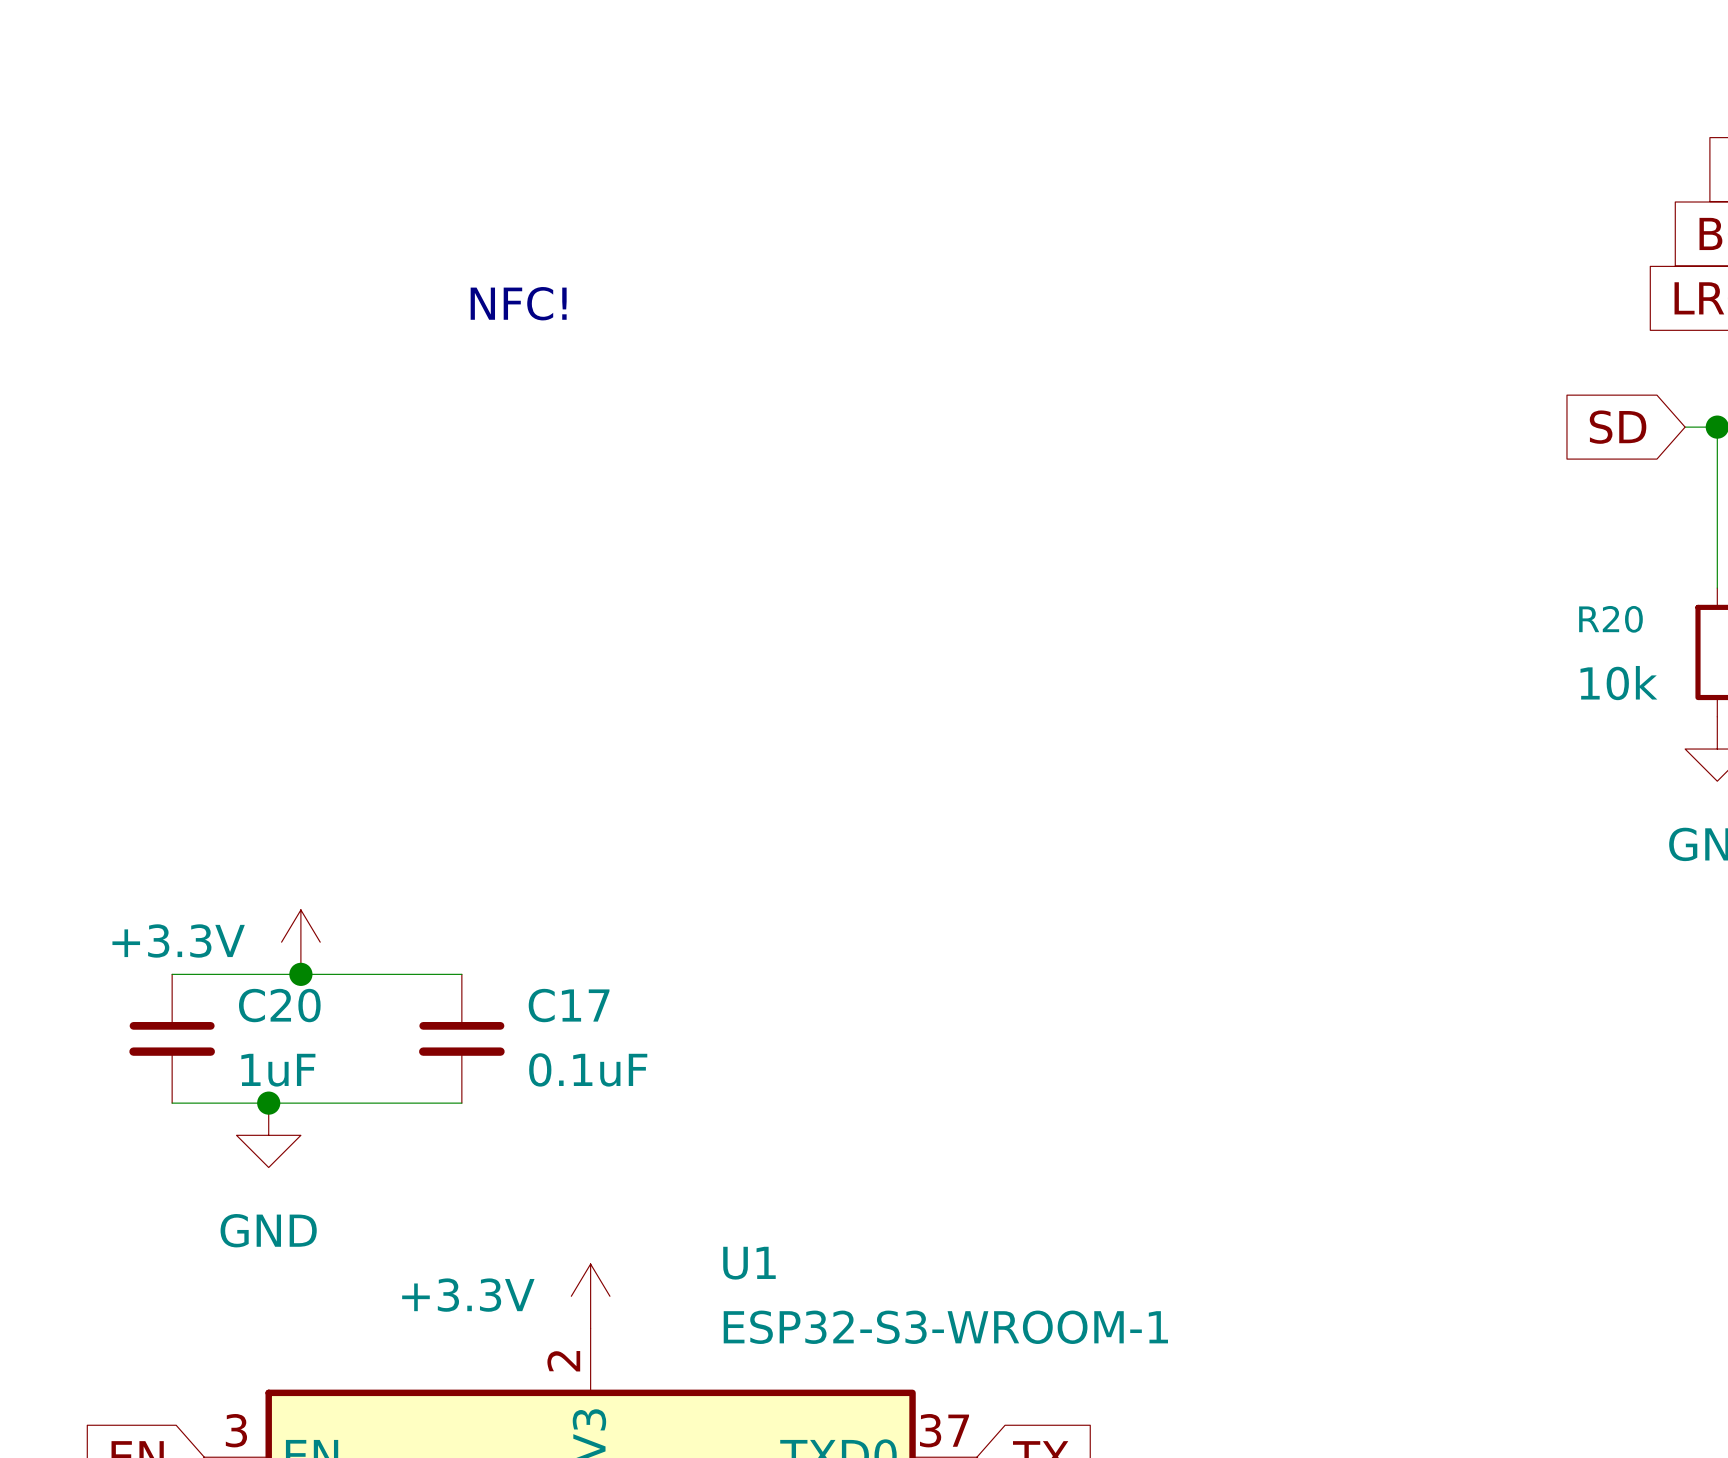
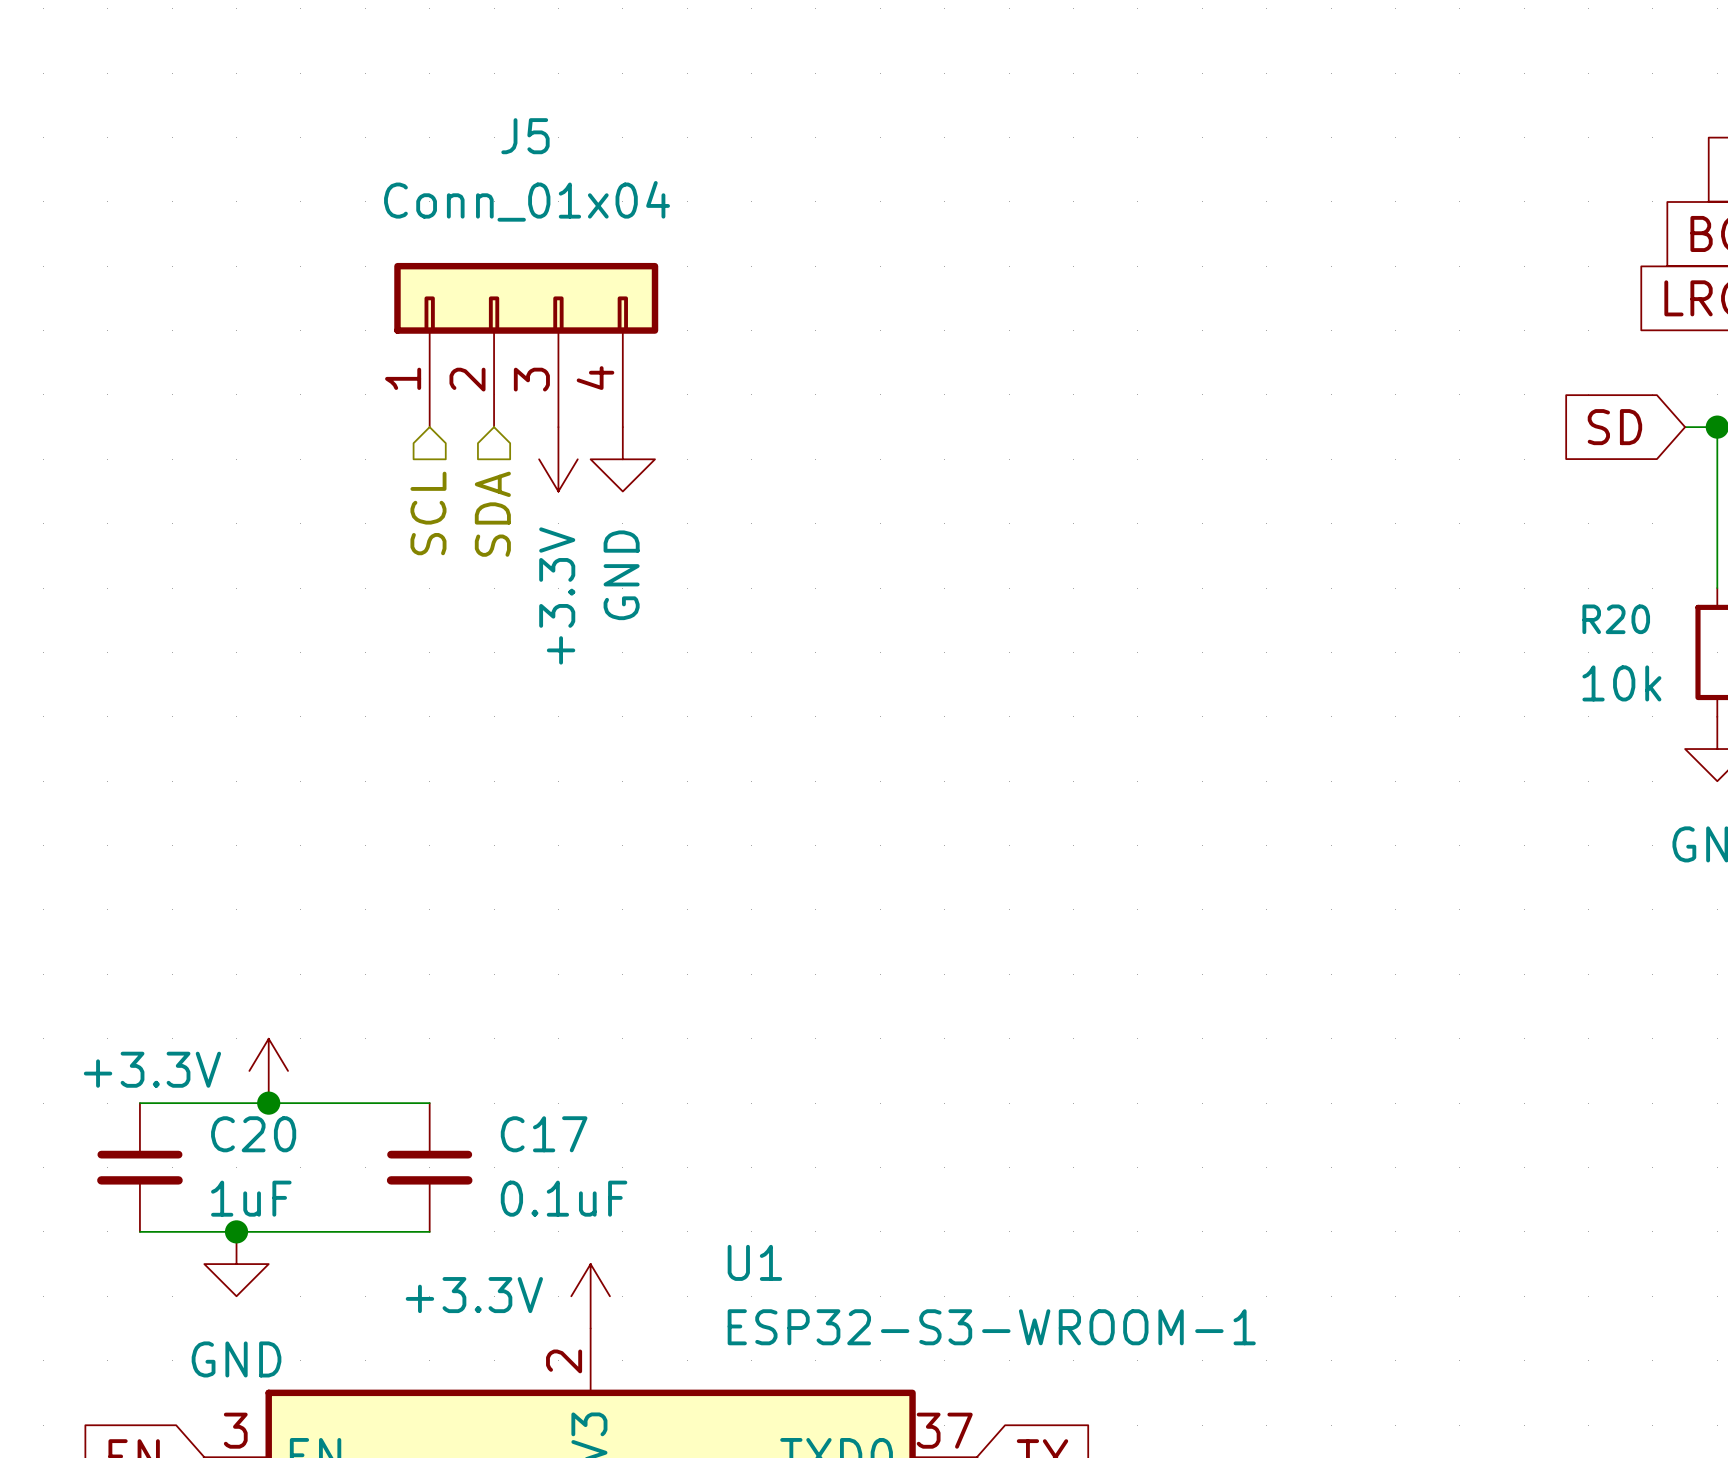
text: NFC! (518, 303) -> none
J5: none -> Conn_01x04 (526, 345)
power symbol: none -> +3.3V (558, 459)
power symbol: none -> GND (622, 459)
hierarchical label: none -> SCL (428, 513)
hierarchical label: none -> SDA (492, 514)
power symbol position: +3.3V (300, 942) -> +3.3V (268, 1070)
wire: (172, 974) (461, 974) -> (139, 1231) (429, 1231)
junction: (300, 974) -> none
C20 position: (172, 1038) -> (139, 1167)
C17 position: (461, 1038) -> (429, 1167)
wire: (429, 1103) (461, 1103) -> (139, 1103) (172, 1103)
power symbol position: GND (268, 1135) -> GND (236, 1264)
junction: none -> (236, 1231)

